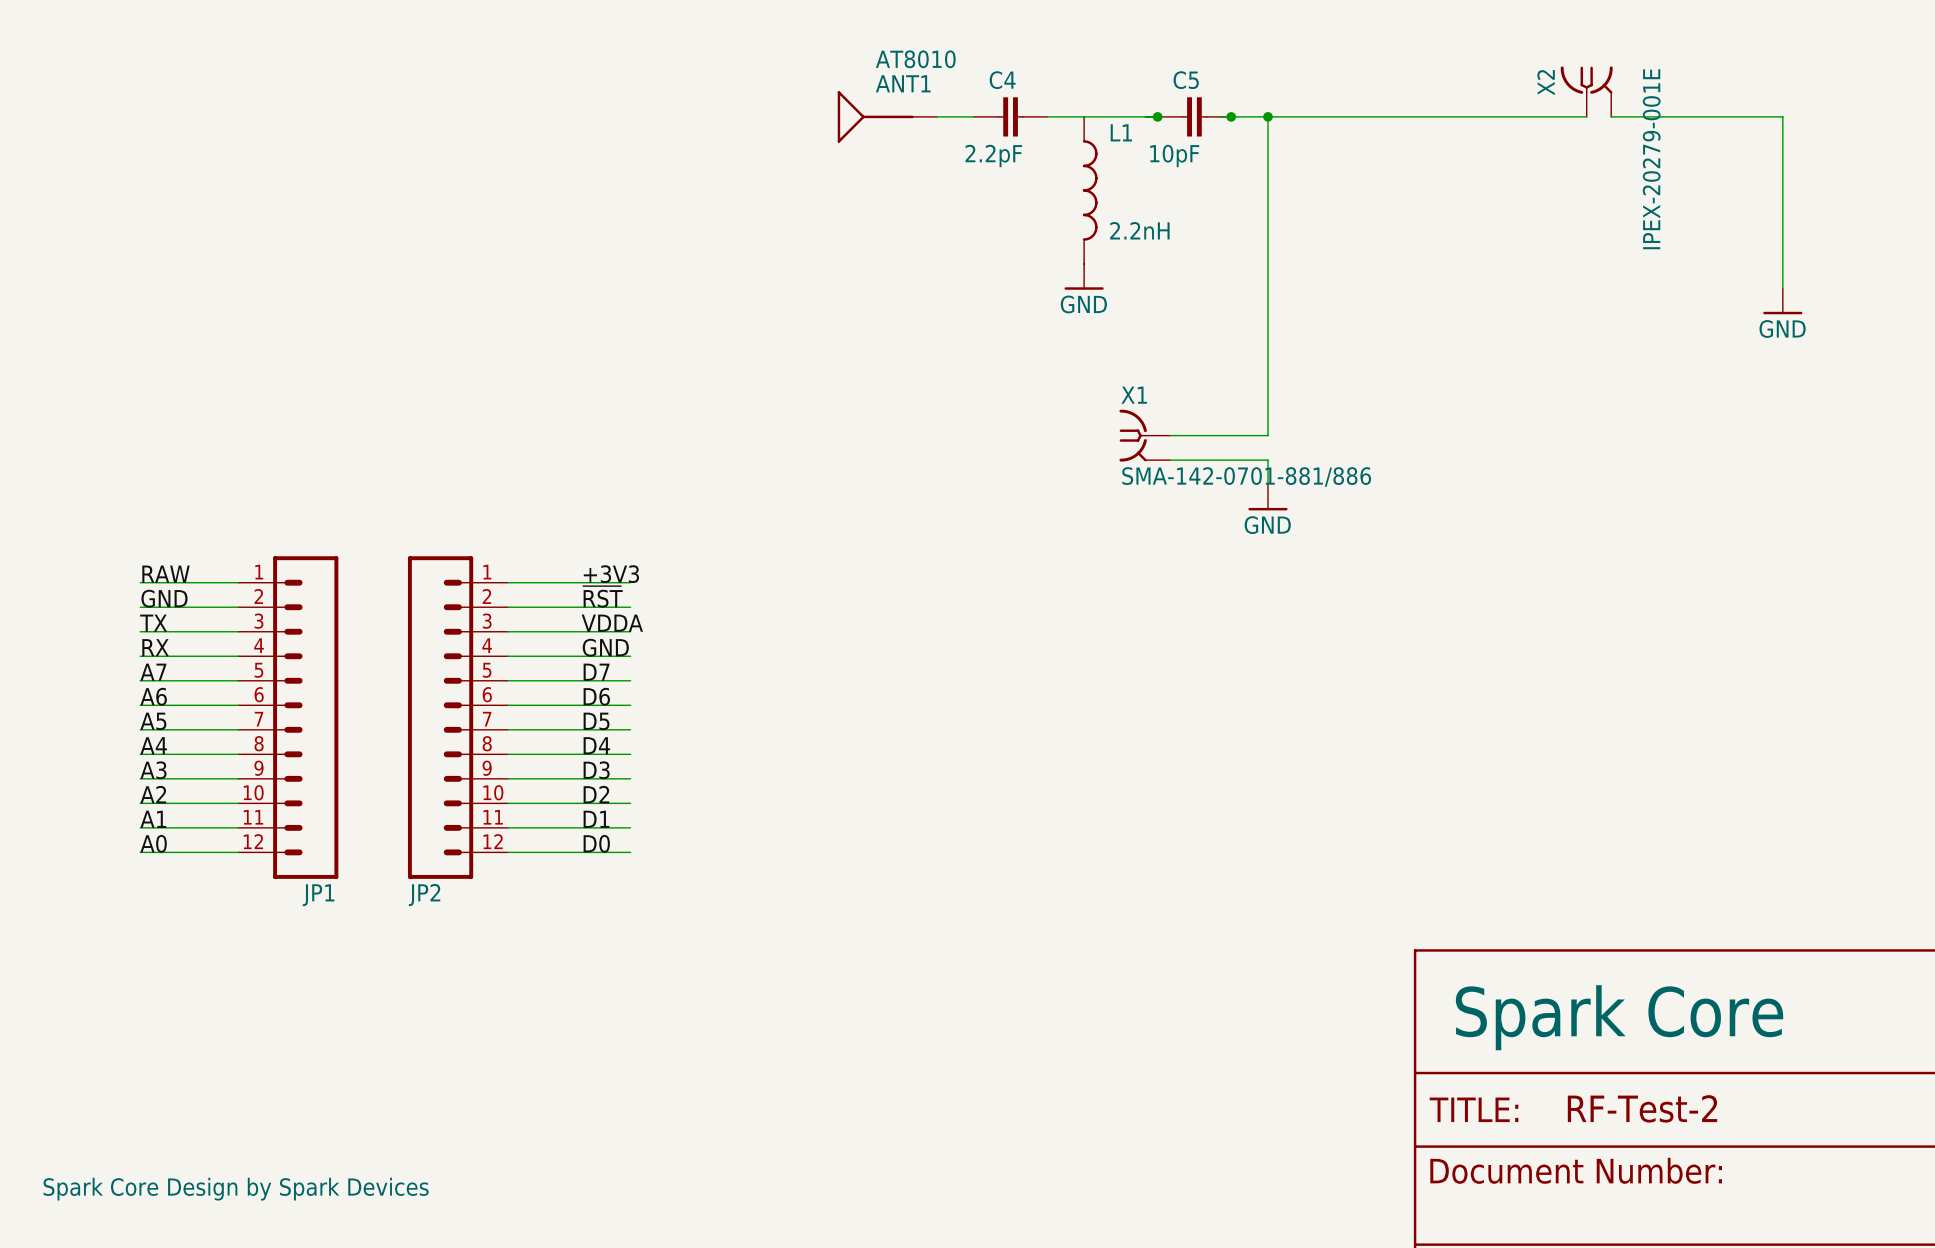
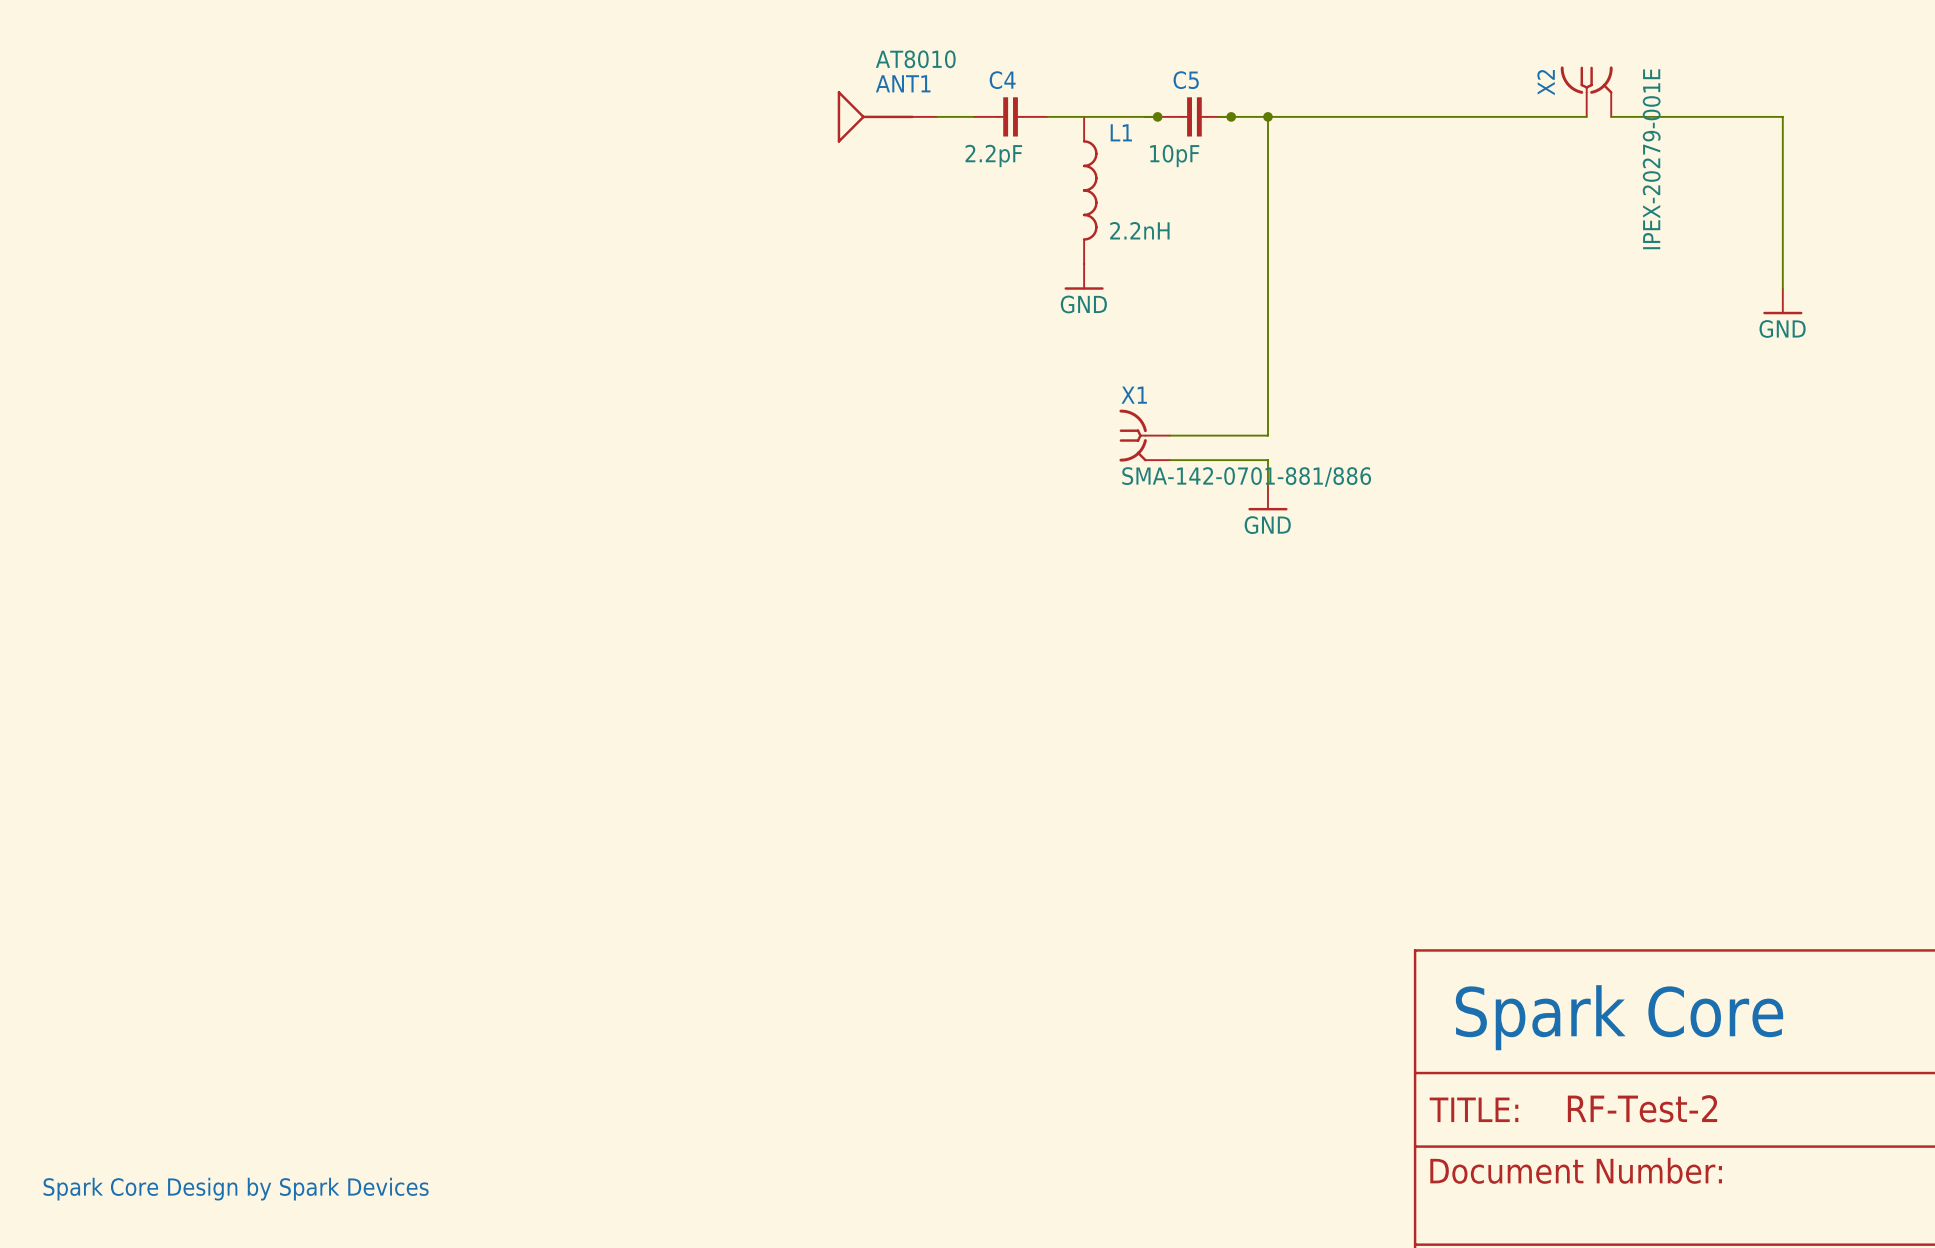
label: RAW (166, 574) -> none
label: +3V3 (611, 574) -> none
wire: (140, 582) (238, 582) -> none
wire: (507, 582) (630, 582) -> none
label: ~{RST} (602, 596) -> none
label: GND (164, 598) -> none
wire: (140, 607) (238, 607) -> none
wire: (507, 607) (630, 607) -> none
label: TX (153, 623) -> none
label: VDDA (612, 623) -> none
wire: (140, 631) (238, 631) -> none
wire: (507, 631) (630, 631) -> none
label: RX (155, 647) -> none
label: GND (605, 647) -> none
wire: (140, 656) (238, 656) -> none
wire: (507, 656) (630, 656) -> none
label: A7 (153, 672) -> none
label: D7 (596, 672) -> none
wire: (140, 680) (238, 680) -> none
wire: (507, 680) (630, 680) -> none
label: A6 (153, 696) -> none
label: D6 (596, 696) -> none
wire: (140, 705) (238, 705) -> none
wire: (507, 705) (630, 705) -> none
JP1: (288, 717) -> none
JP2: (457, 717) -> none
label: A5 (153, 721) -> none
label: D5 (596, 721) -> none
wire: (140, 729) (238, 729) -> none
wire: (507, 729) (630, 729) -> none
label: A4 (153, 745) -> none
label: D4 (596, 745) -> none
wire: (140, 754) (238, 754) -> none
wire: (507, 754) (630, 754) -> none
label: A3 (153, 770) -> none
label: D3 (596, 770) -> none
wire: (140, 778) (238, 778) -> none
wire: (507, 778) (630, 778) -> none
label: A2 (153, 794) -> none
label: D2 (596, 794) -> none
wire: (140, 803) (238, 803) -> none
wire: (507, 803) (630, 803) -> none
label: A1 (153, 819) -> none
label: D1 (596, 819) -> none
wire: (140, 827) (238, 827) -> none
wire: (507, 827) (630, 827) -> none
label: A0 (153, 843) -> none
label: D0 (596, 843) -> none
wire: (140, 852) (238, 852) -> none
wire: (507, 852) (630, 852) -> none

